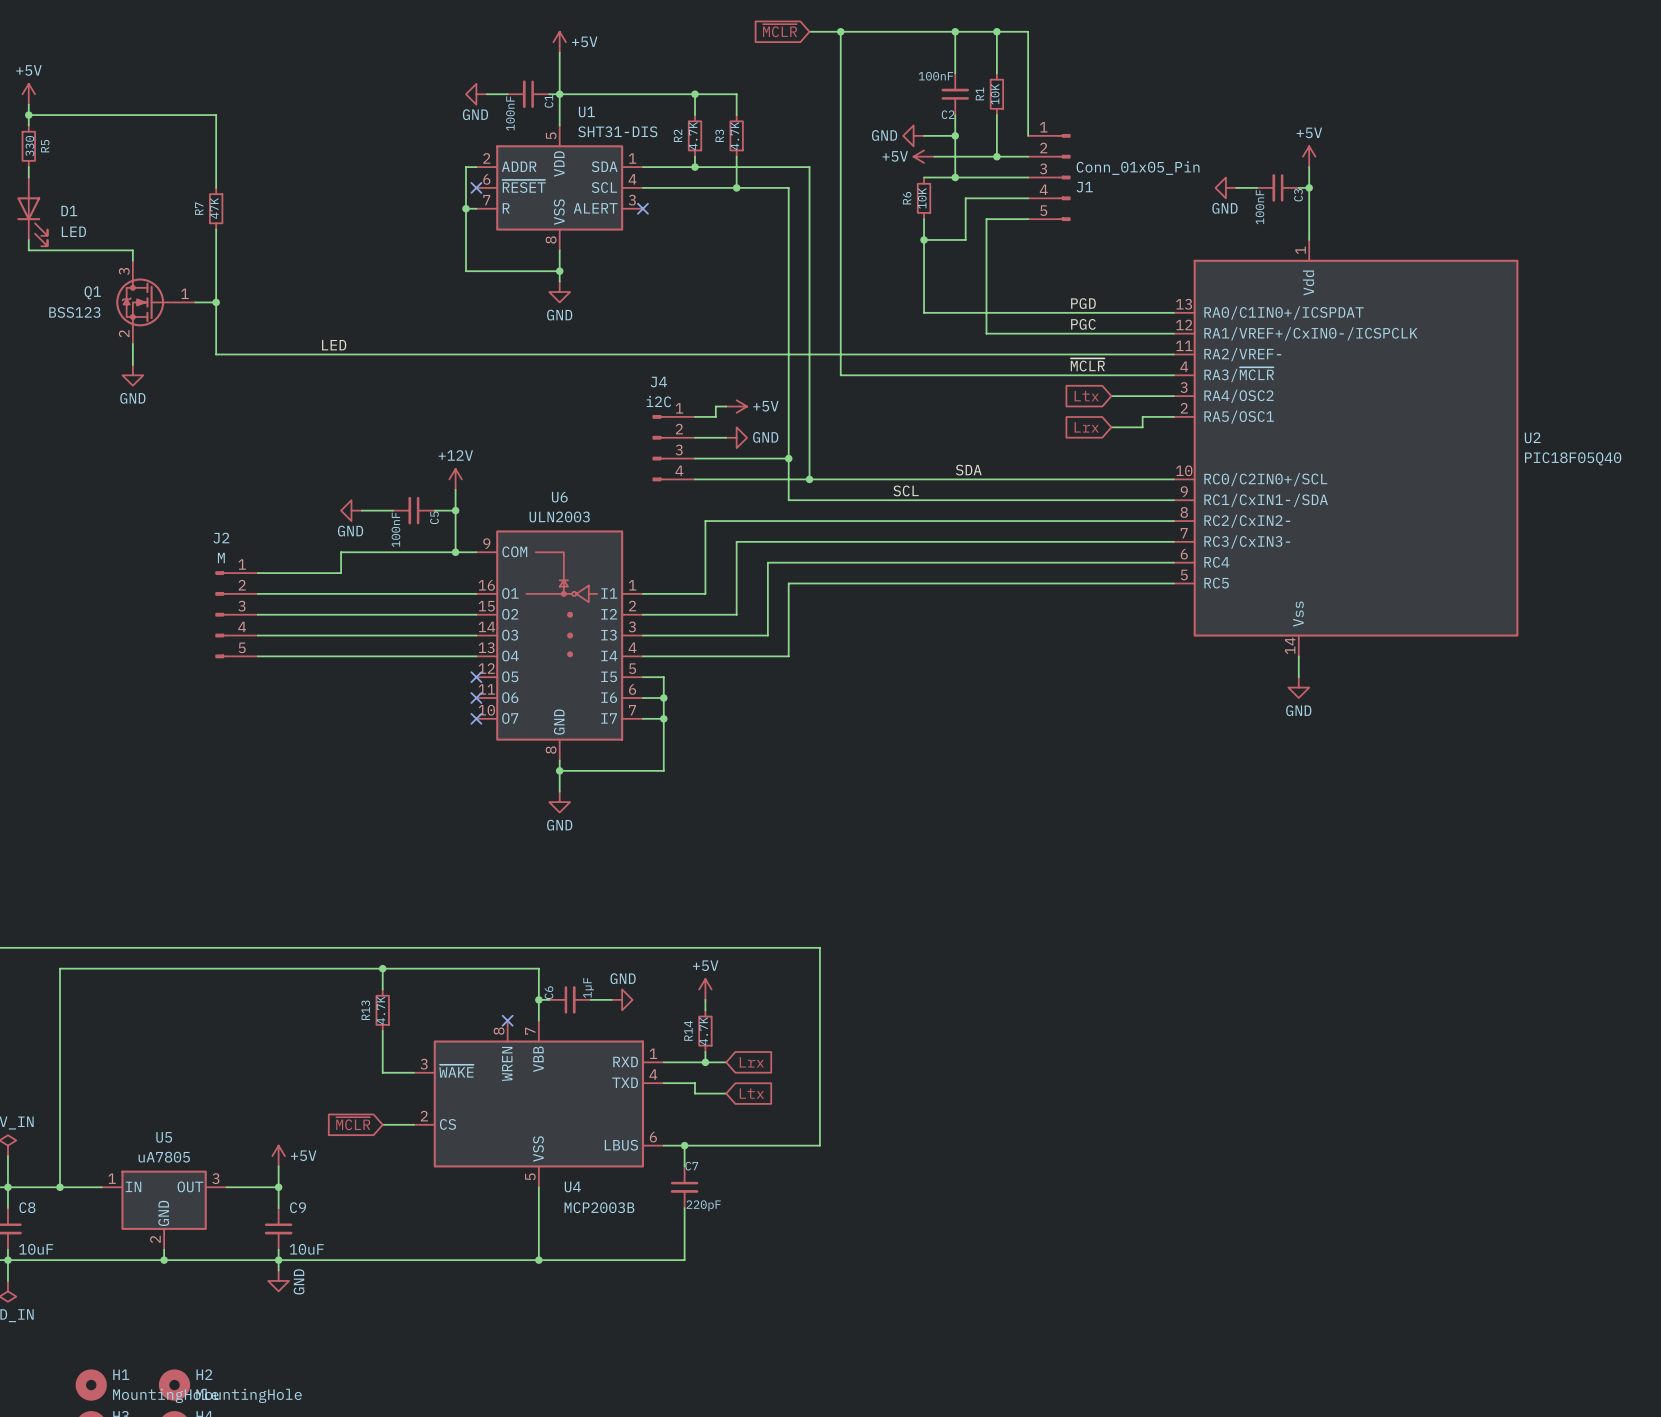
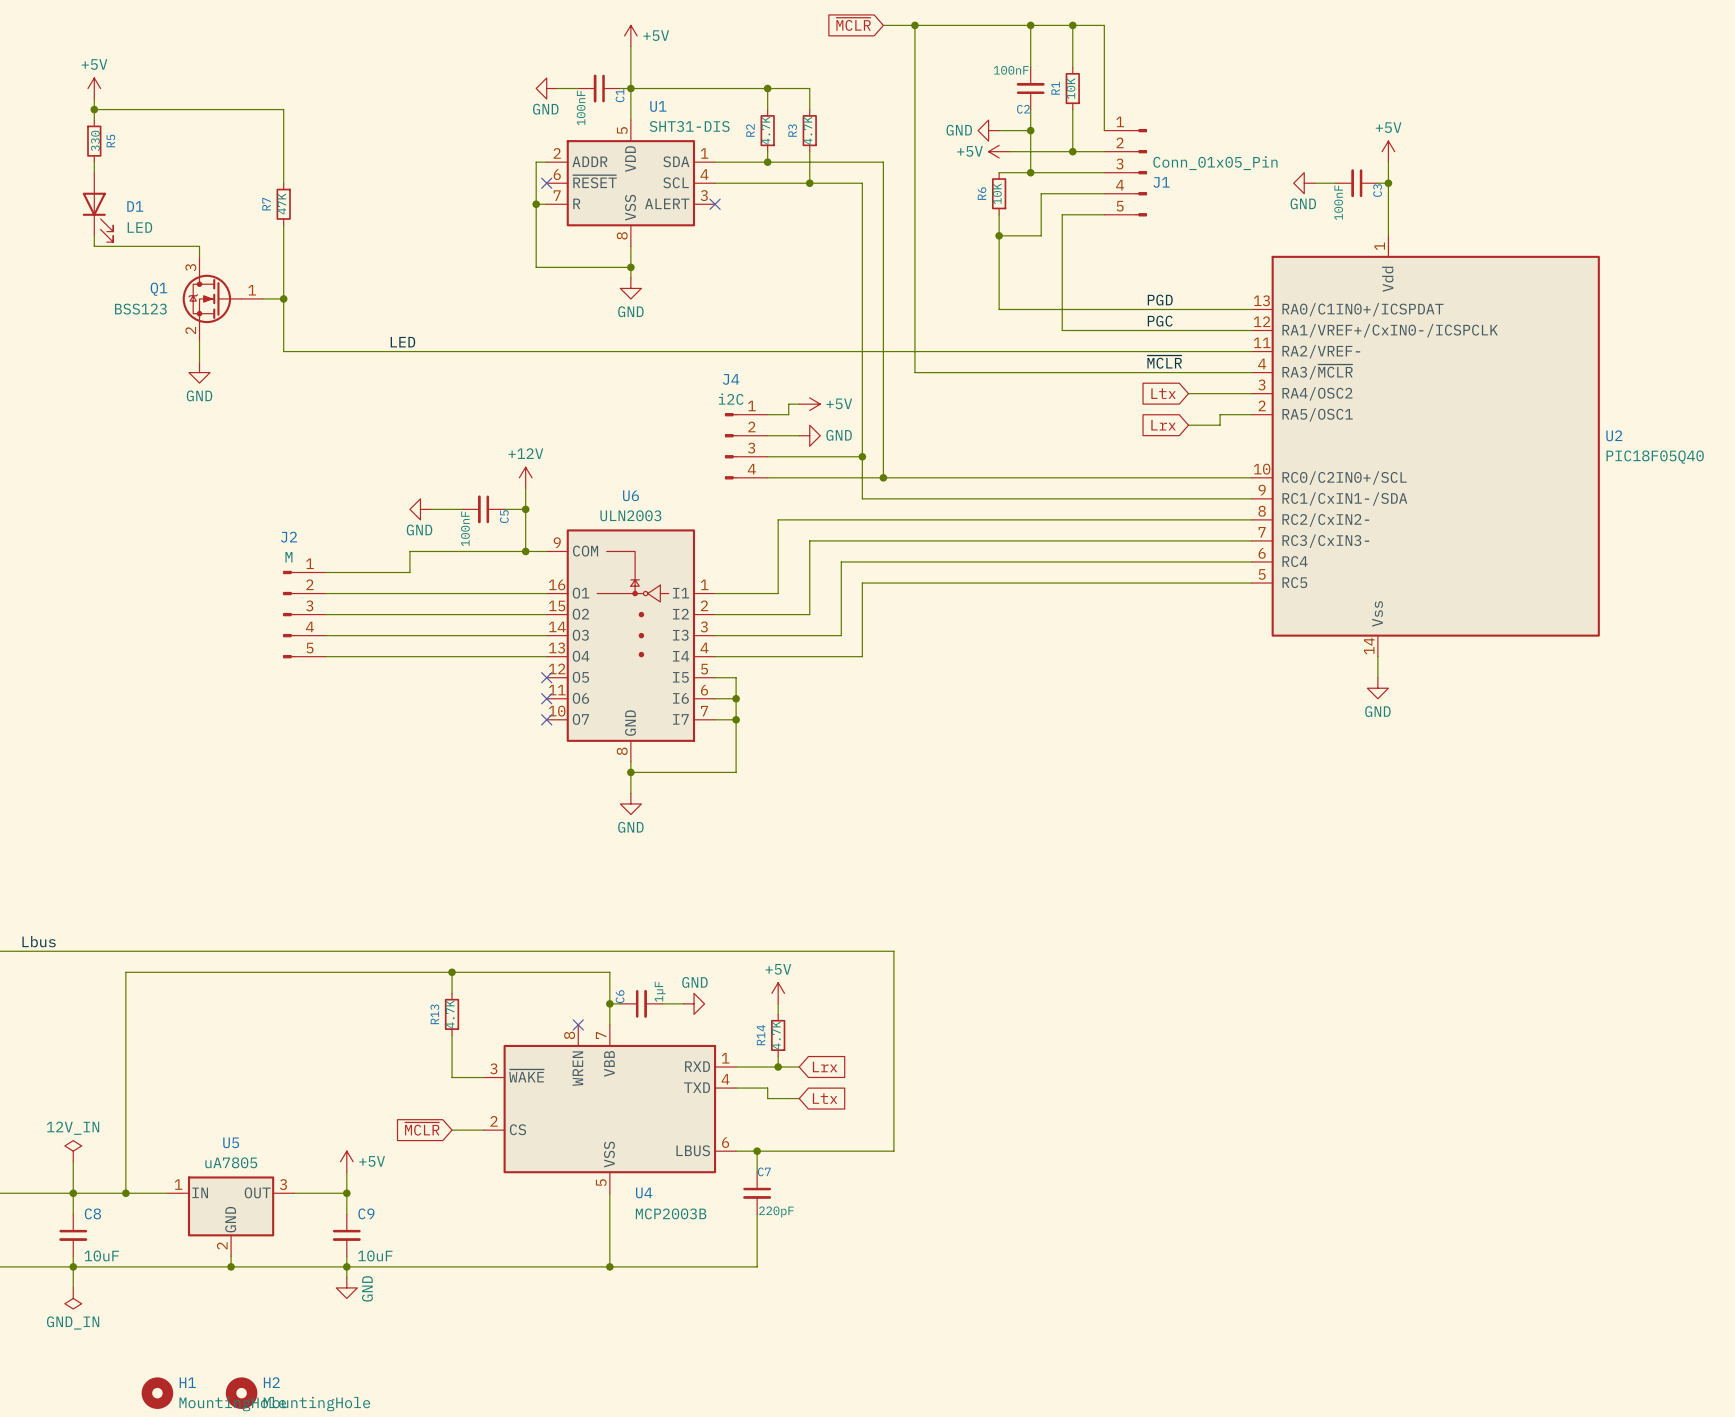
label: SDA (968, 470) -> none
label: SCL (906, 490) -> none

